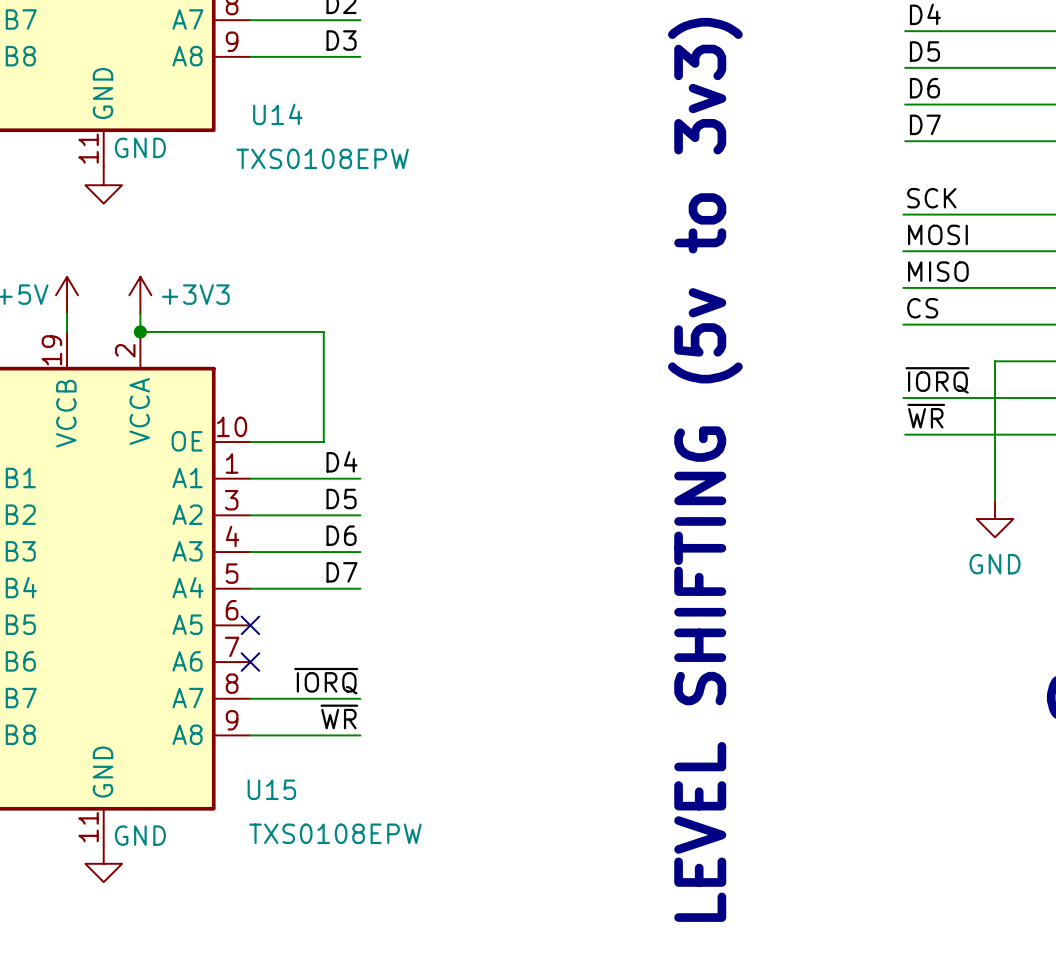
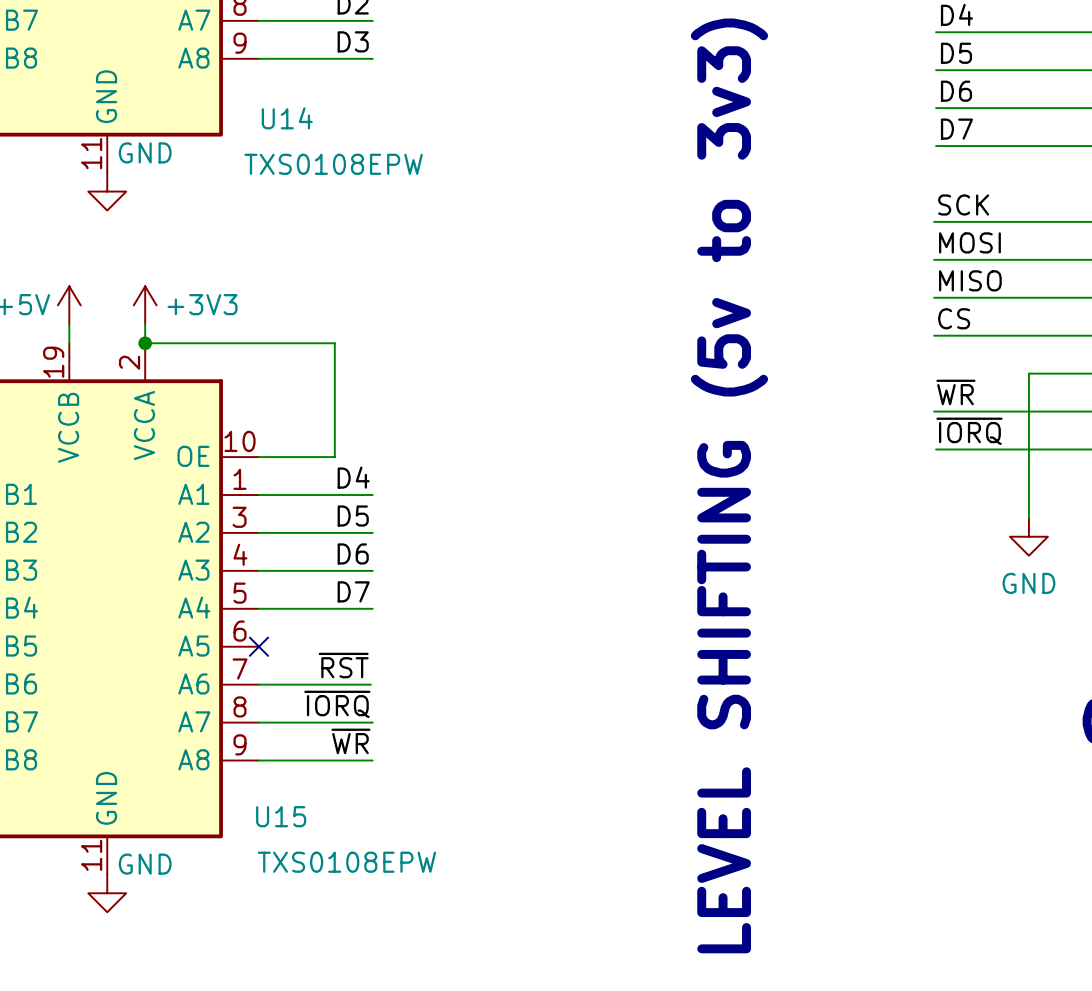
label: ~{IORQ} (937, 380) -> ~{WR} (955, 392)
label: ~{WR} (926, 416) -> ~{IORQ} (969, 431)
label: none -> ~{RST} (343, 665)
wire: none -> (258, 684) (370, 684)
no-connect mark: (250, 662) -> none

